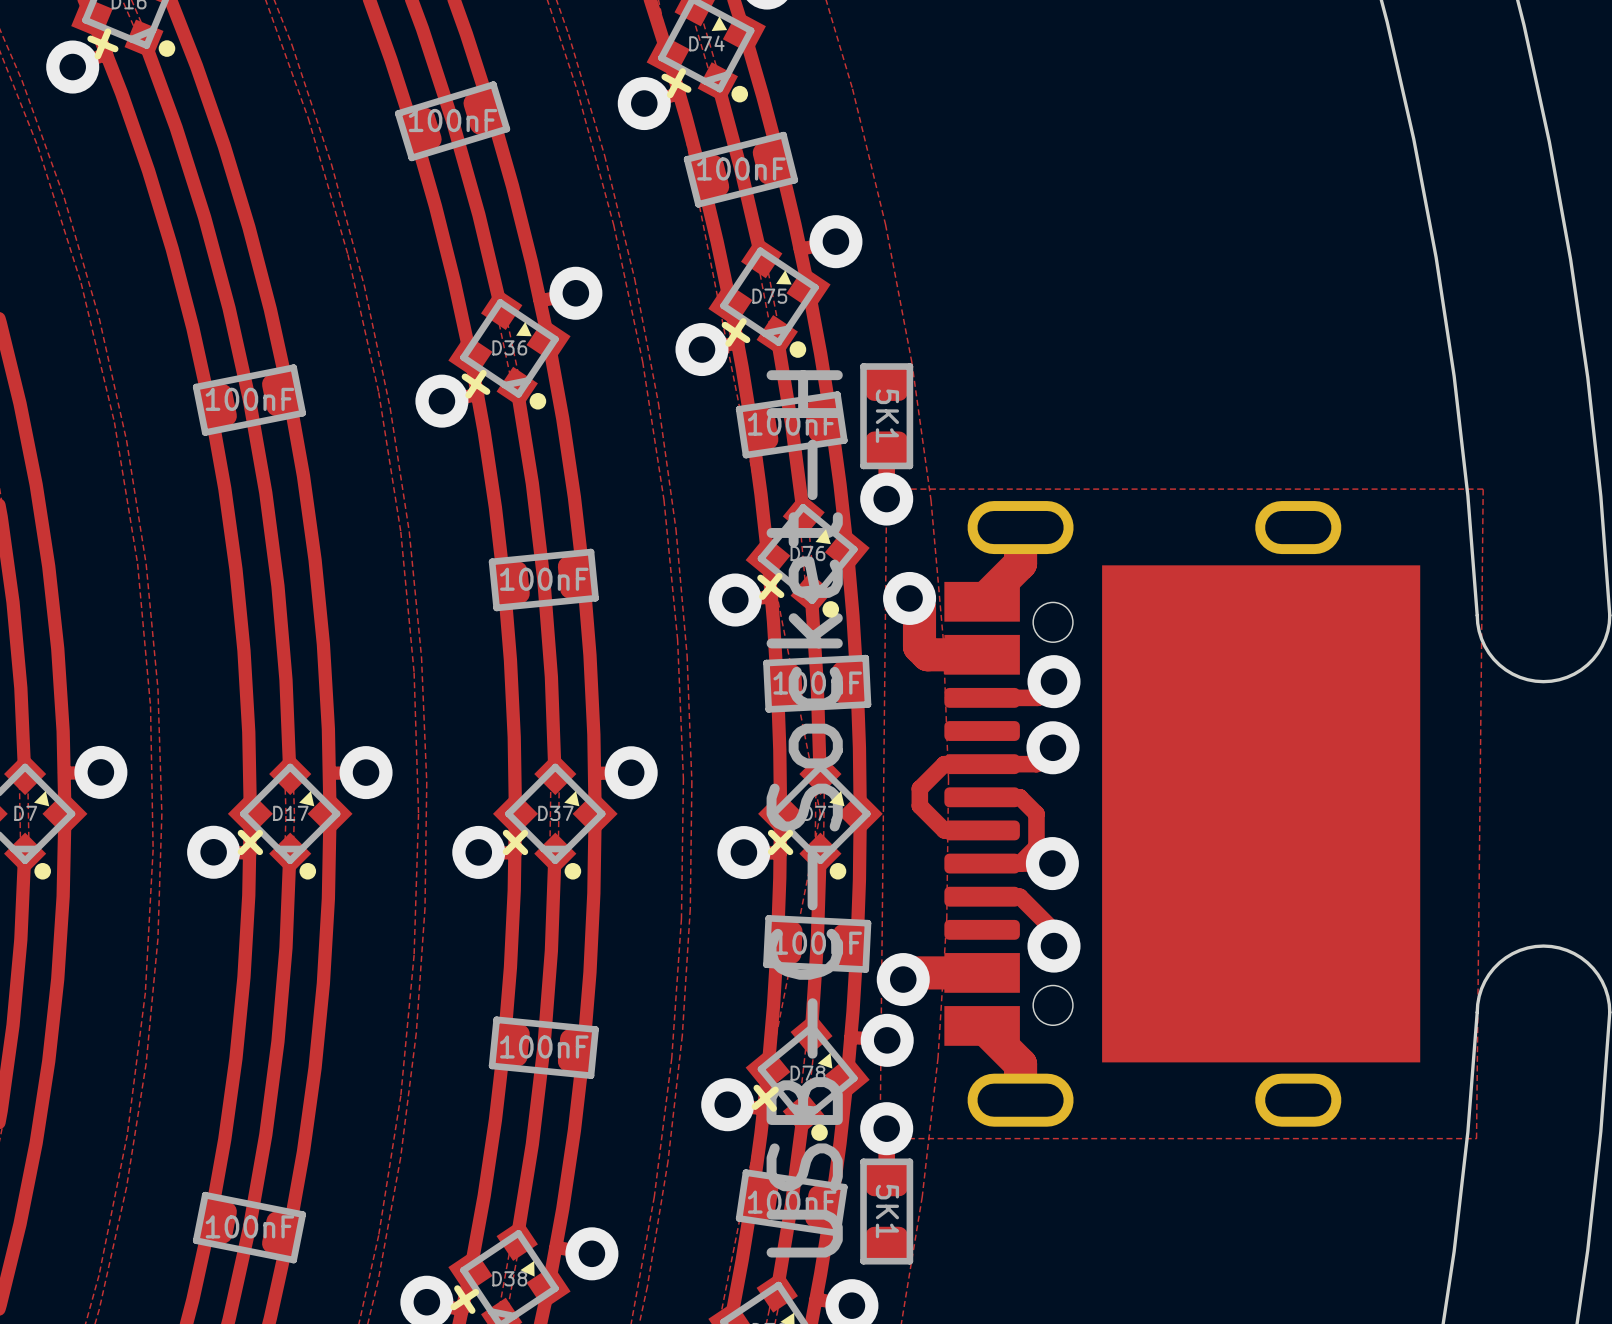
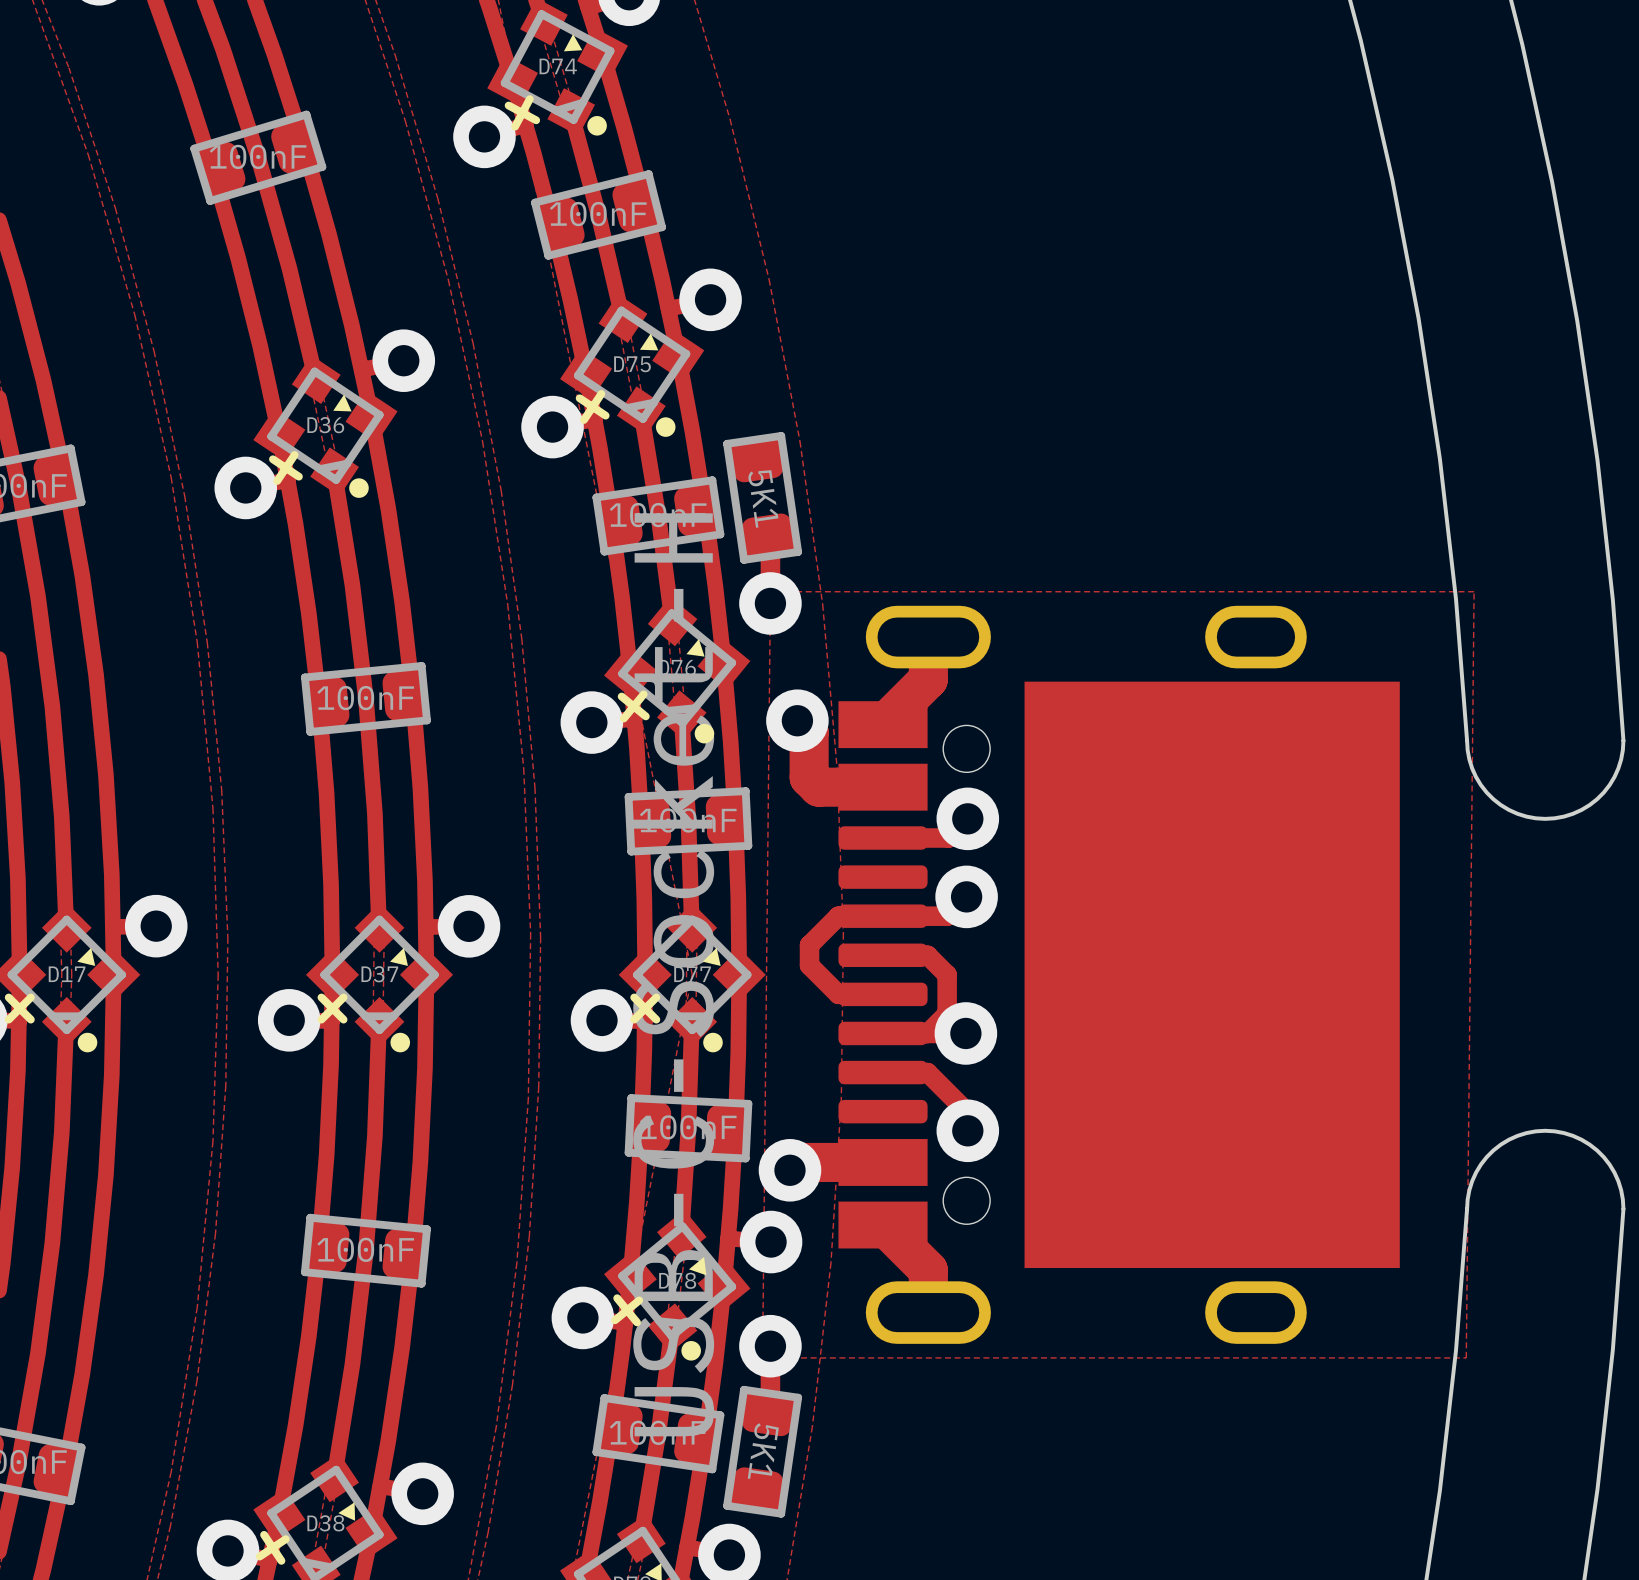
part rotation: 0° (886, 416) -> 8.3° counterclockwise (762, 497)
part rotation: 0° (886, 1211) -> 8.3° clockwise (762, 1451)

